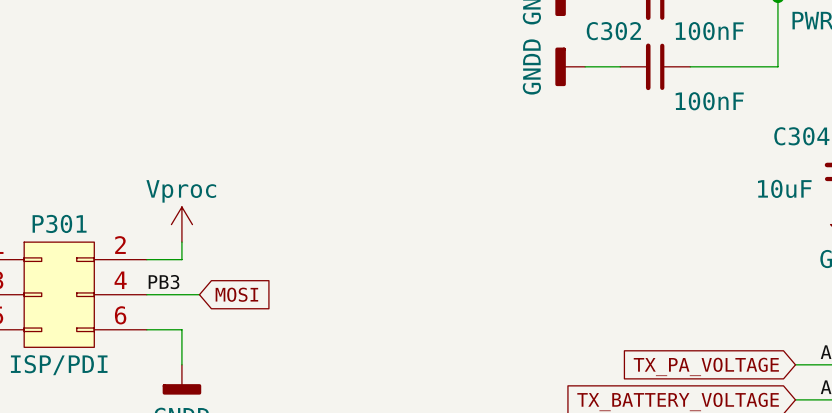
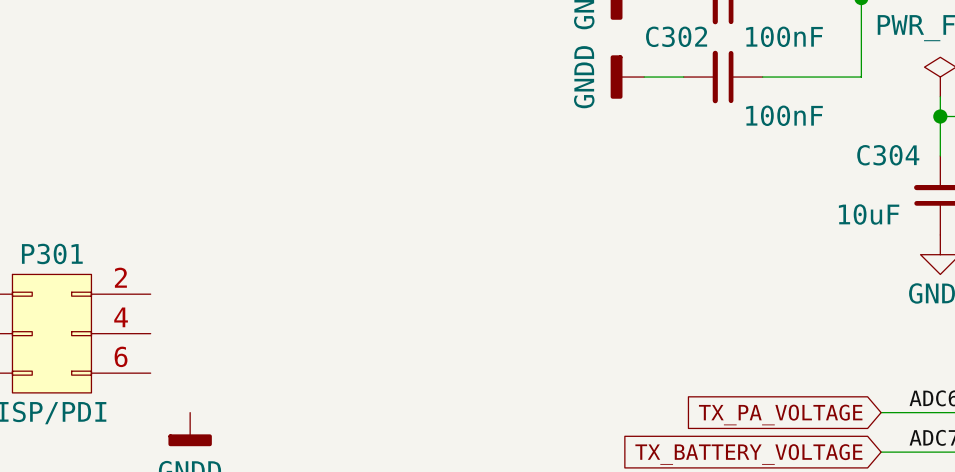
power symbol: Vproc (181, 224) -> none
wire: (181, 242) (181, 259) (146, 259) -> none
label: PB3 (164, 282) -> none
wire: (146, 294) (199, 294) -> none
global label: MOSI (236, 294) -> none
wire: (146, 329) (181, 329) (181, 364) -> none

